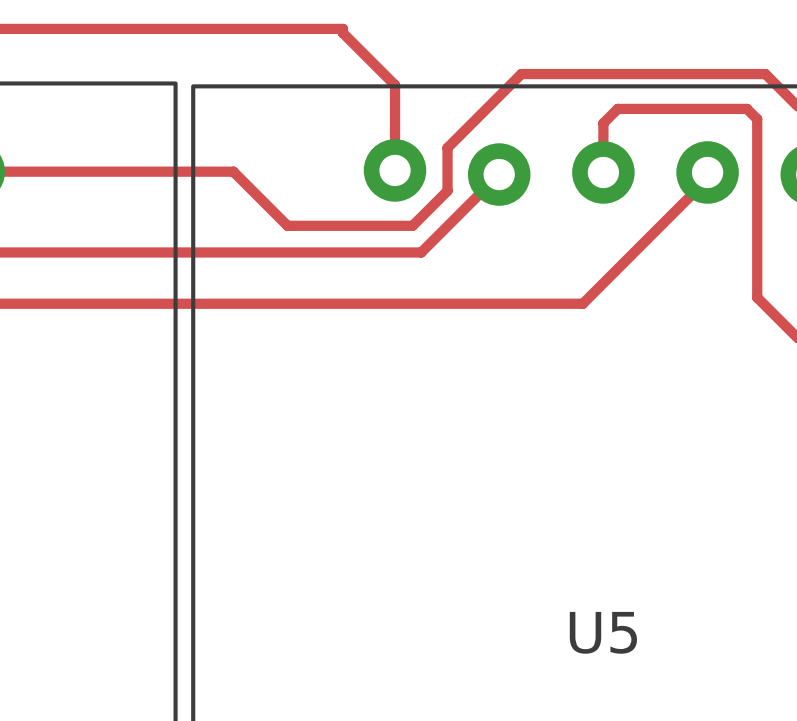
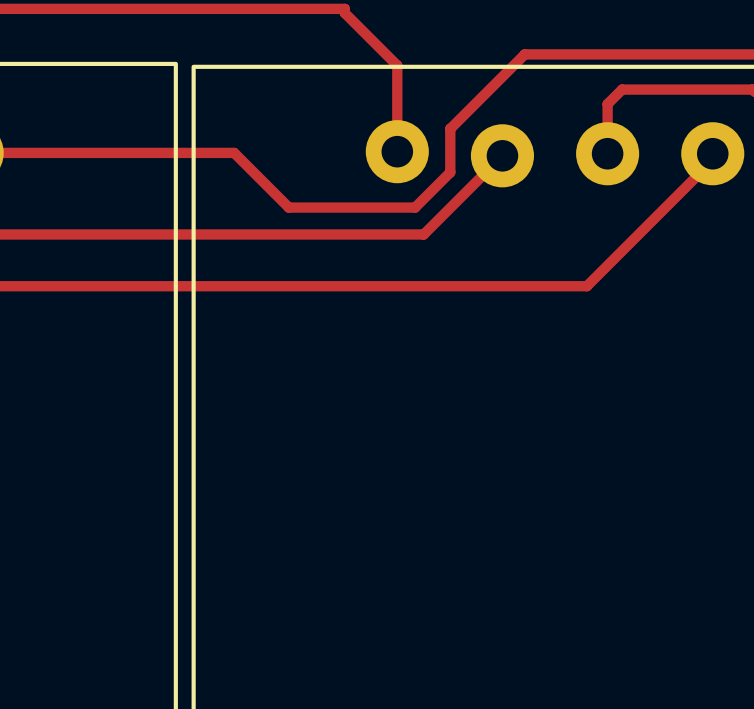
U5 name: U5 (603, 632) -> none

